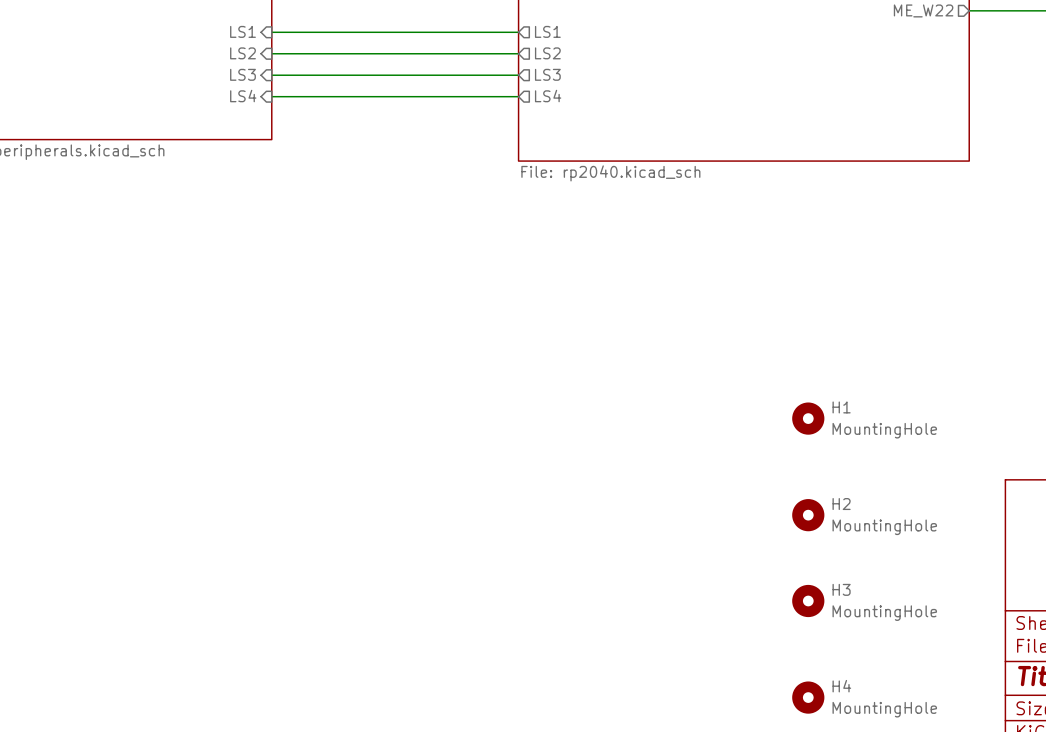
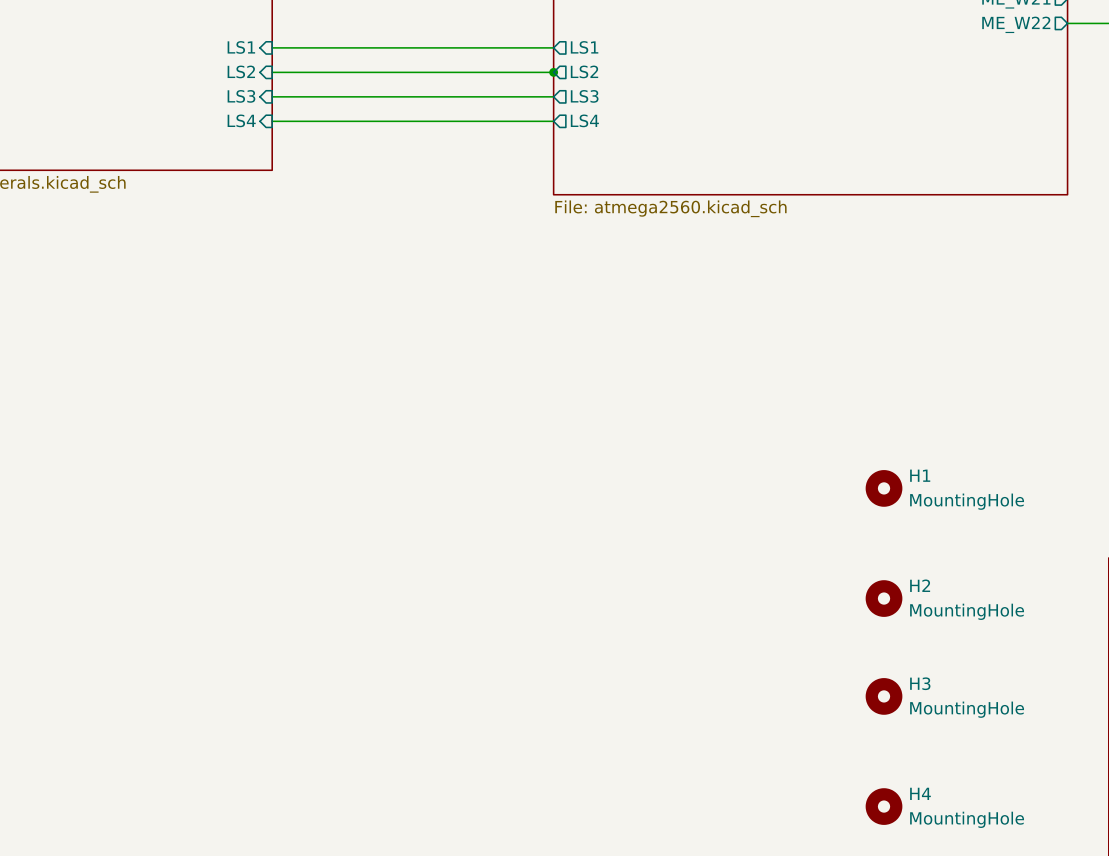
junction: none -> (553, 72)
sheet value: File: rp2040.kicad_sch (610, 173) -> File: atmega2560.kicad_sch (670, 208)

